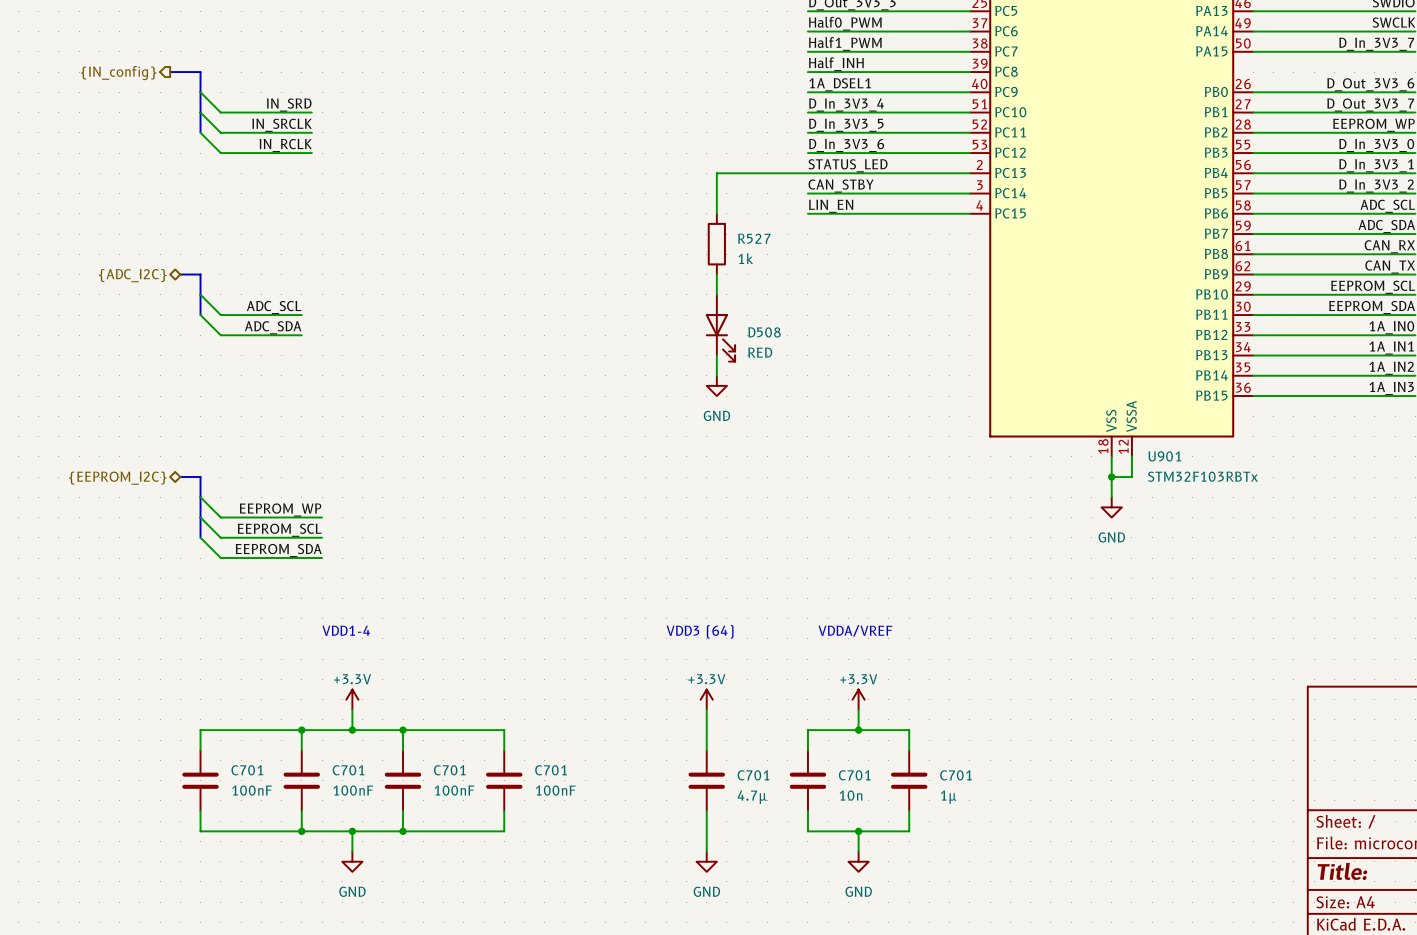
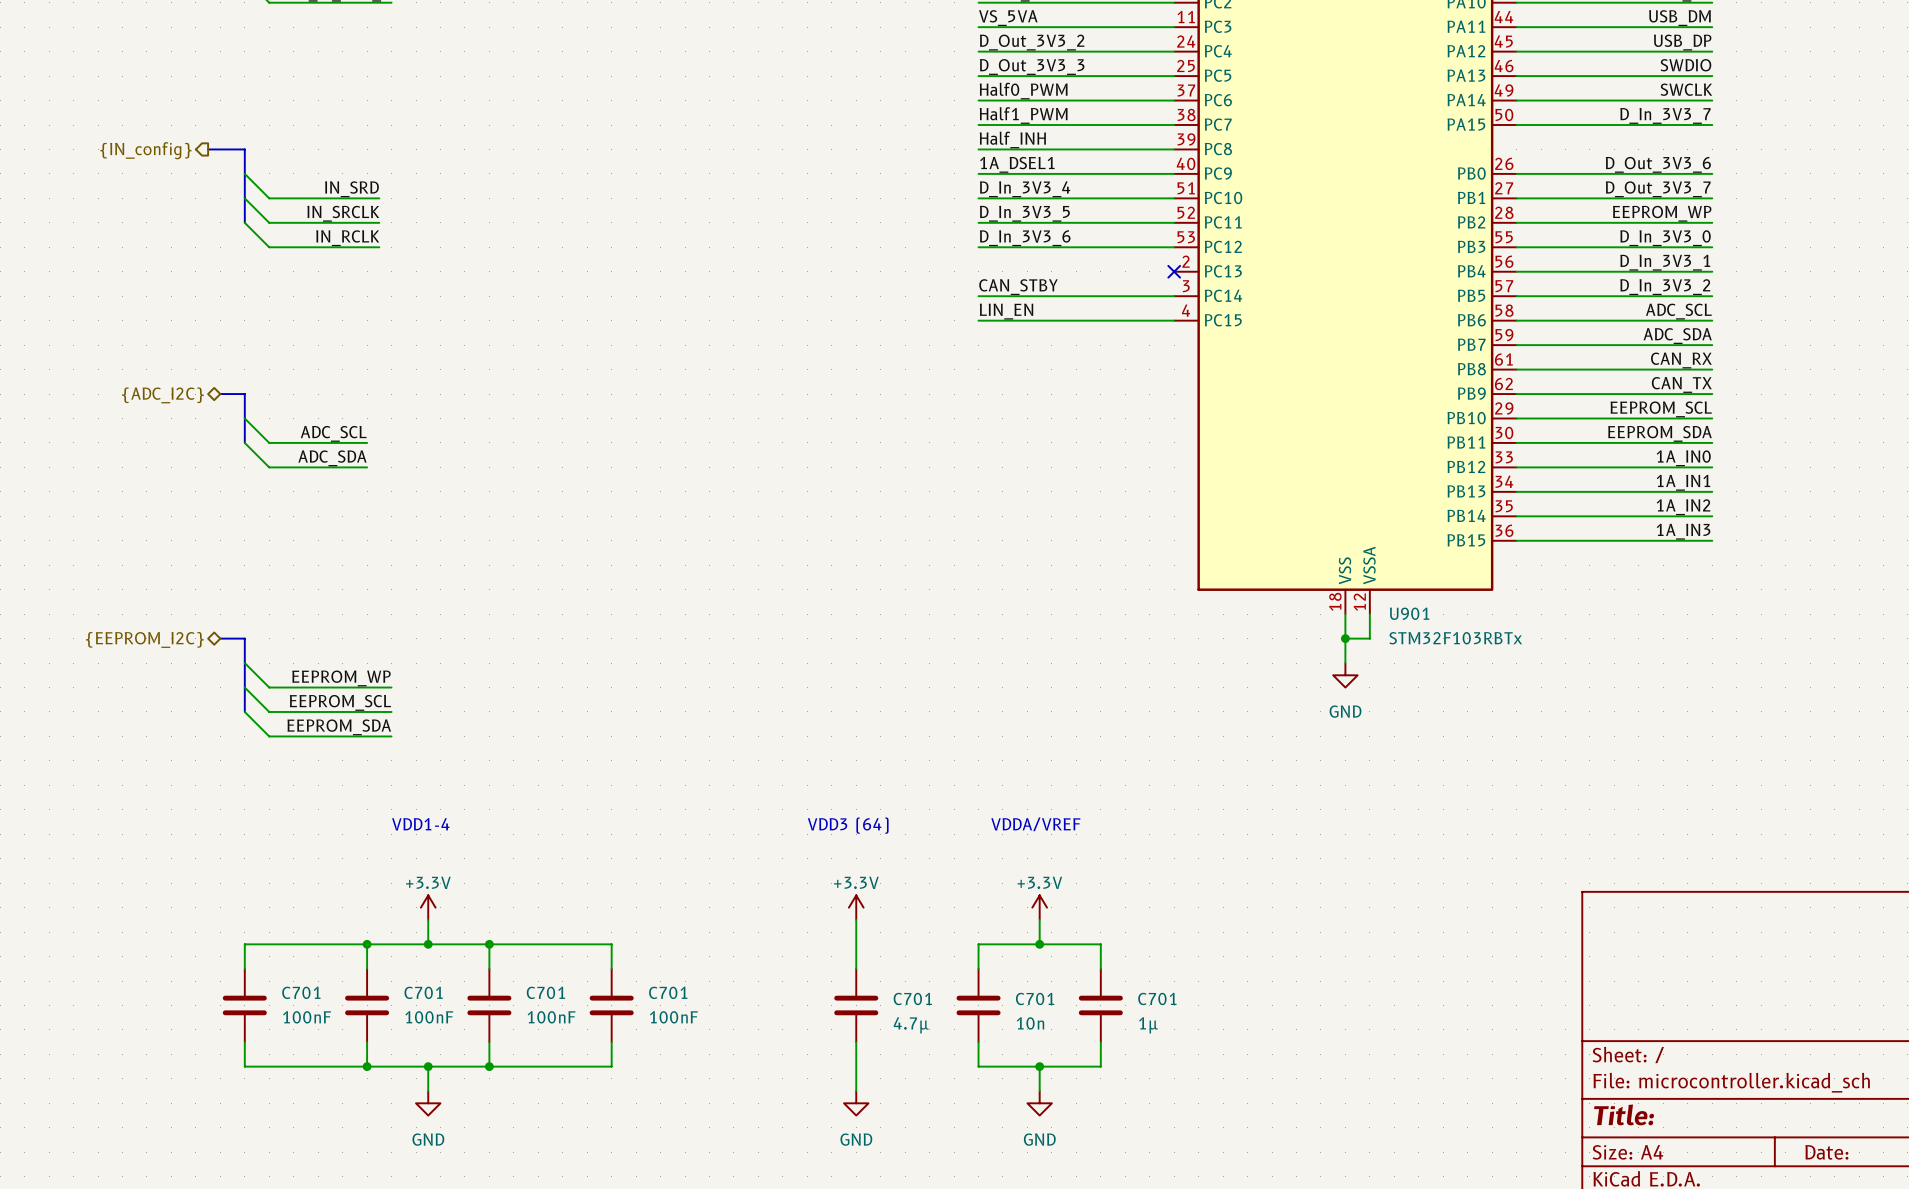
label: STATUS_LED (848, 165) -> none
wire: (969, 173) (716, 173) (716, 213) -> none
no-connect mark: none -> (1174, 271)
R527: 1k (716, 244) -> none
wire: (716, 274) (716, 294) -> none
D508: RED (720, 328) -> none
wire: (716, 355) (716, 375) -> none
power symbol: GND (716, 385) -> none

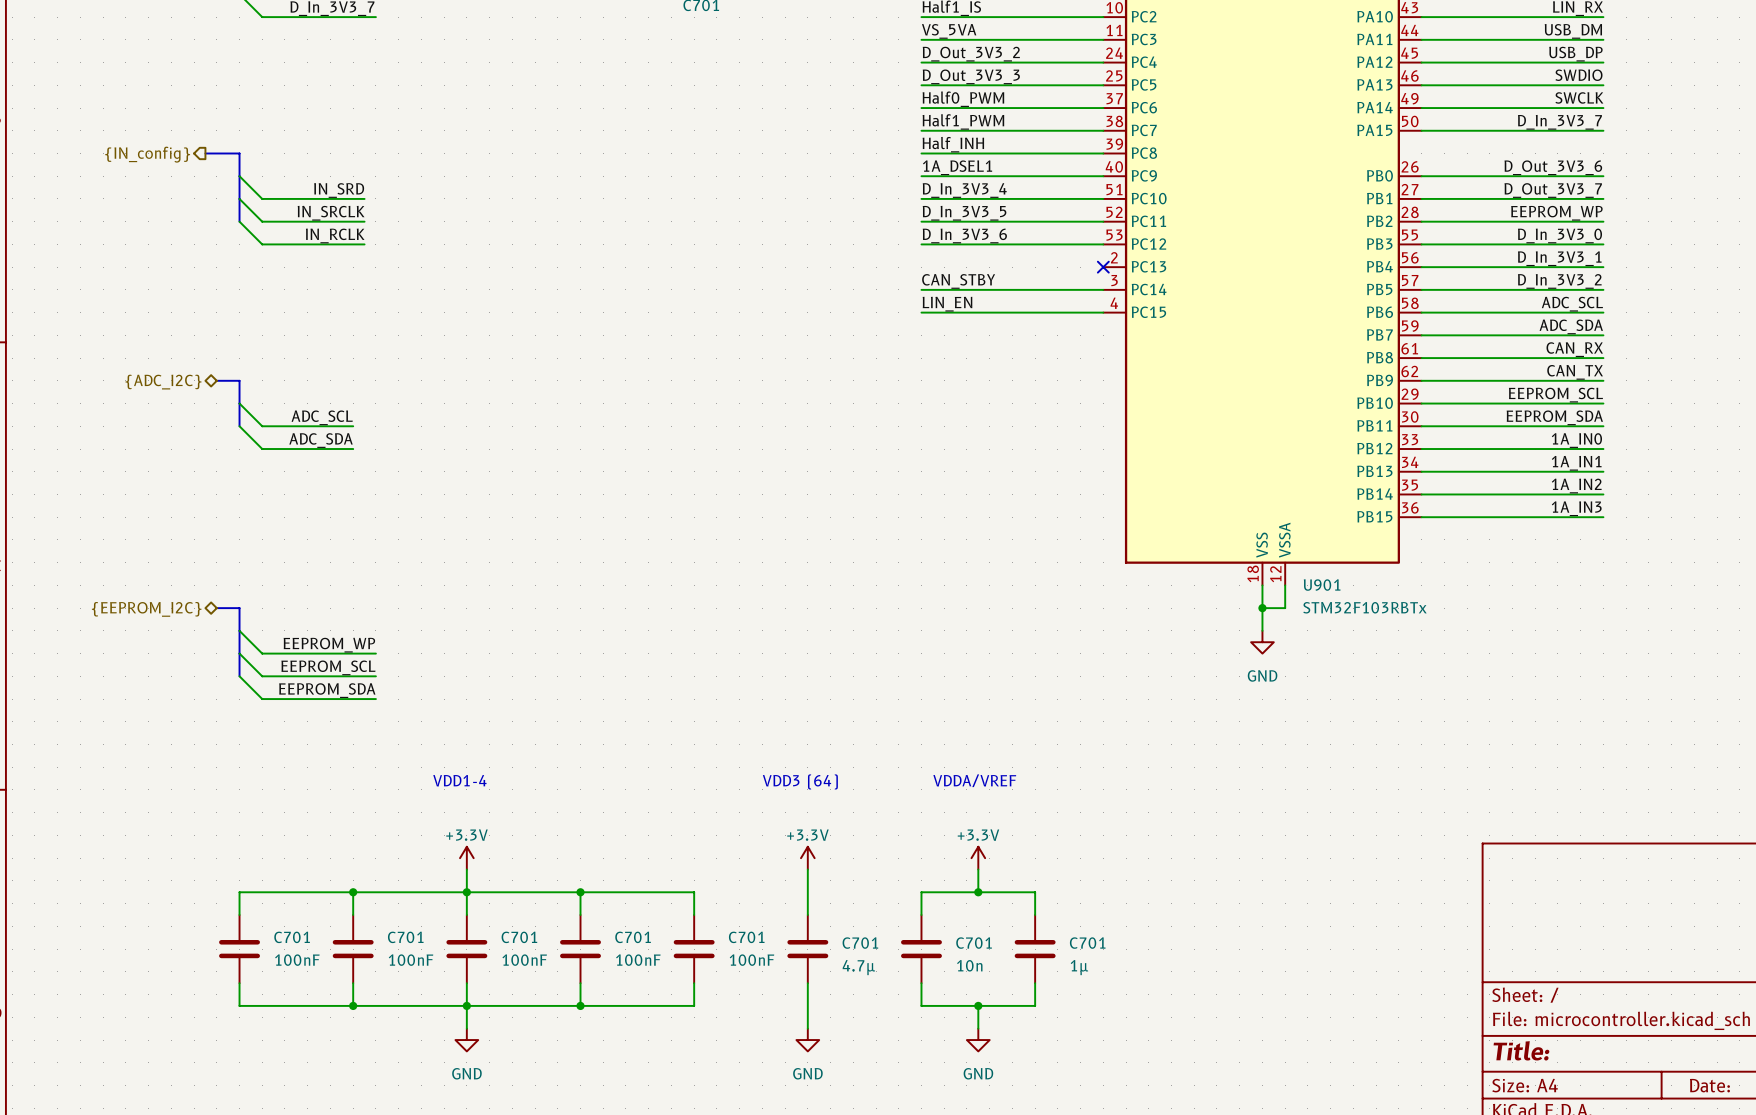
text position: VDD1-4 (420, 824) -> VDD1-4 (459, 780)
power symbol position: +3.3V (428, 907) -> +3.3V (466, 858)
wire: (428, 919) (428, 944) -> (466, 869) (466, 892)
junction: (428, 944) -> none
wire: none -> (580, 892) (694, 892) (694, 915)
junction: none -> (580, 892)
C701: none -> 100nF (694, 949)
wire: none -> (694, 983) (694, 1005) (580, 1005)
wire: (428, 1066) (428, 1091) -> (466, 1005) (466, 1028)
junction: (428, 1066) -> none
junction: none -> (580, 1005)
power symbol position: GND (428, 1103) -> GND (466, 1040)

